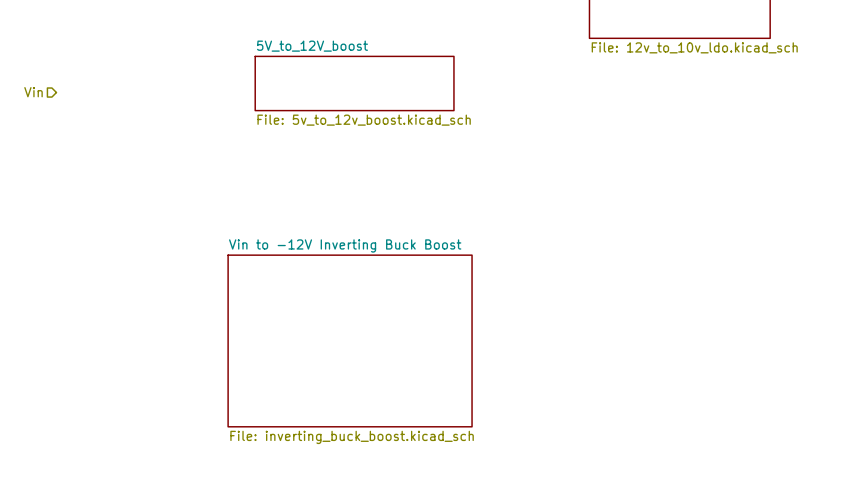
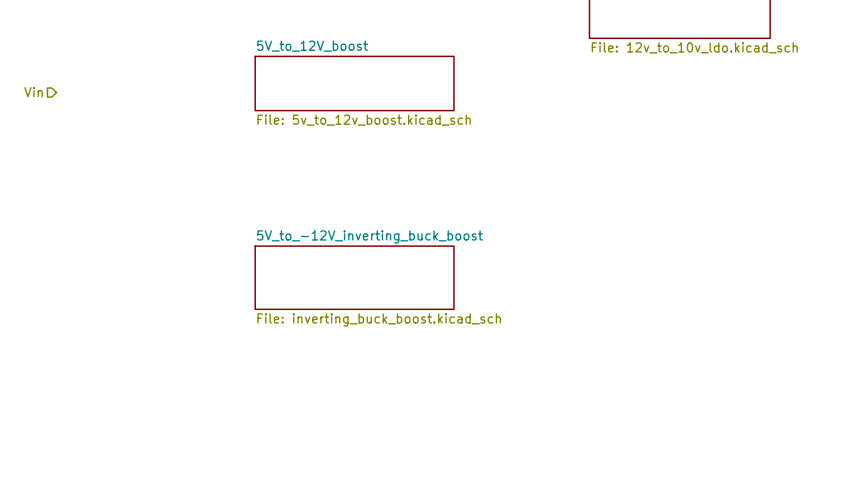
sheet 5V_to_-12V_inverting_buck_boost: none -> File: inverting_buck_boost.kicad_sch (354, 277)
sheet Vin to -12V Inverting Buck Boost: File: inverting_buck_boost.kicad_sch (350, 340) -> none

